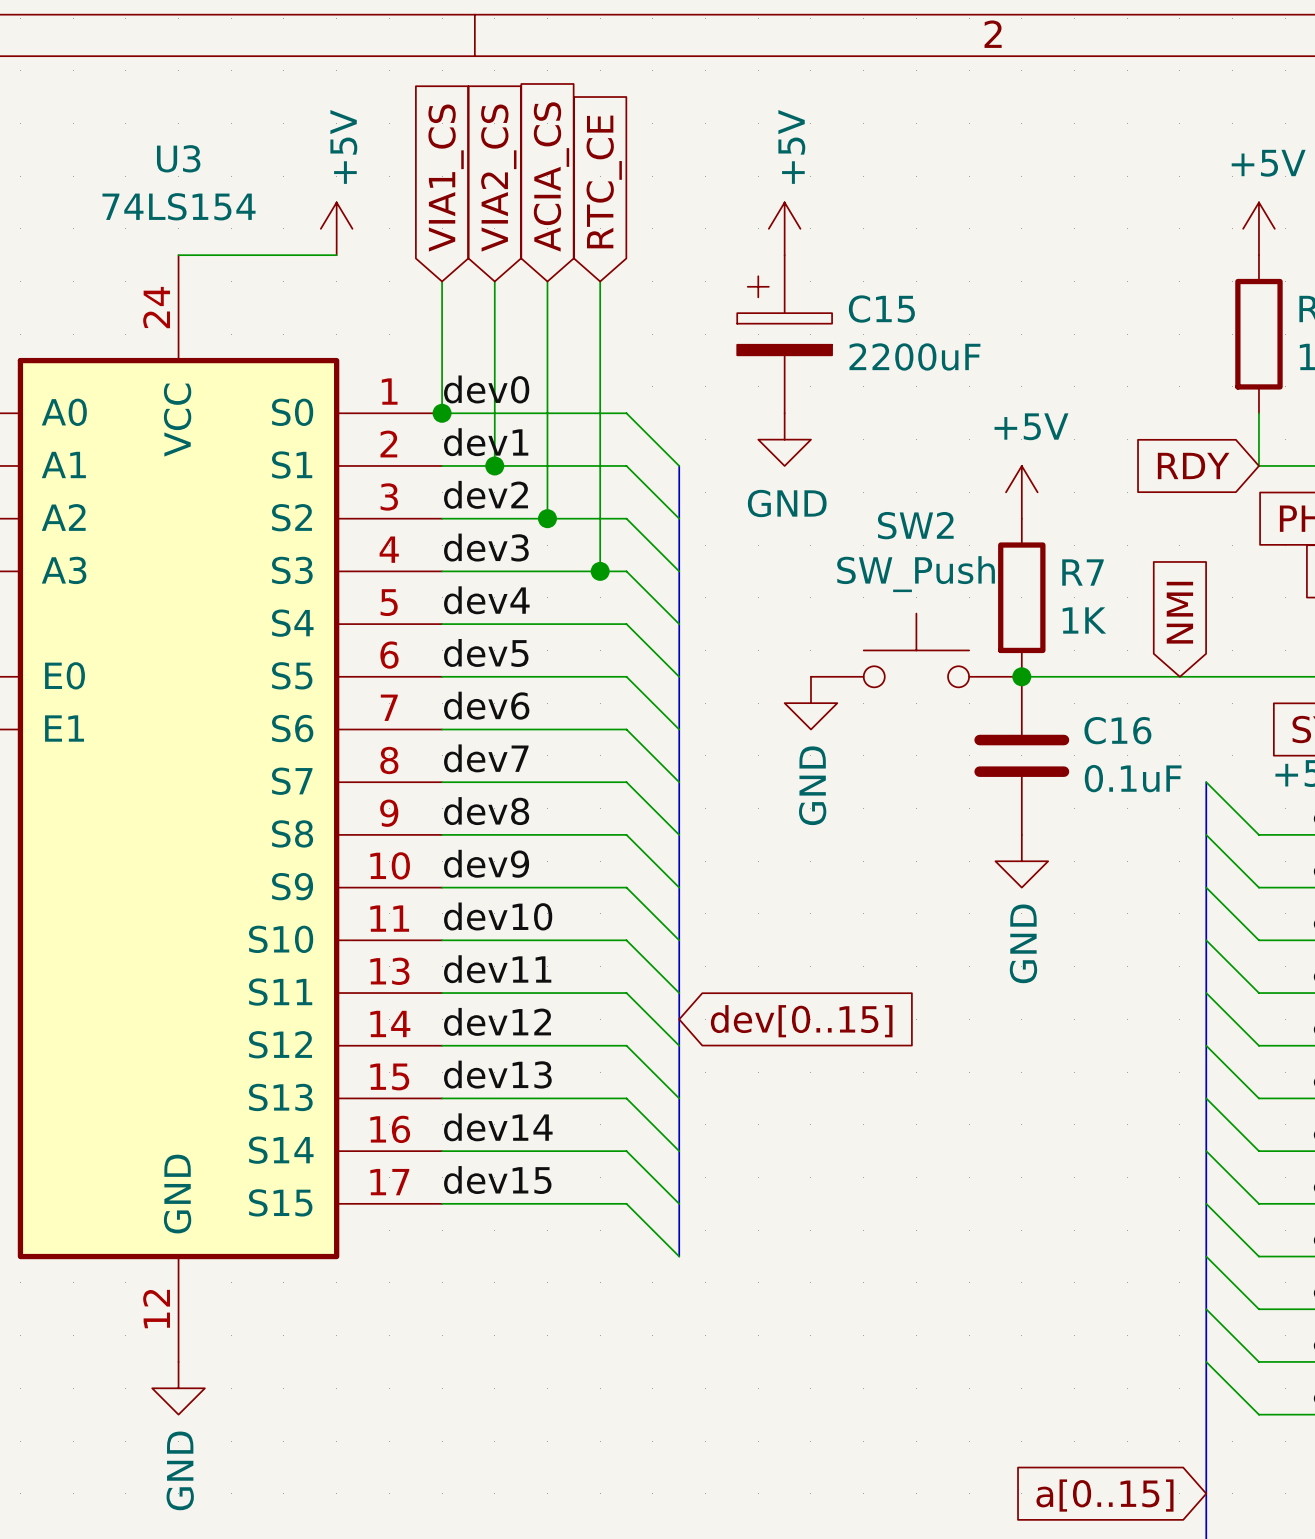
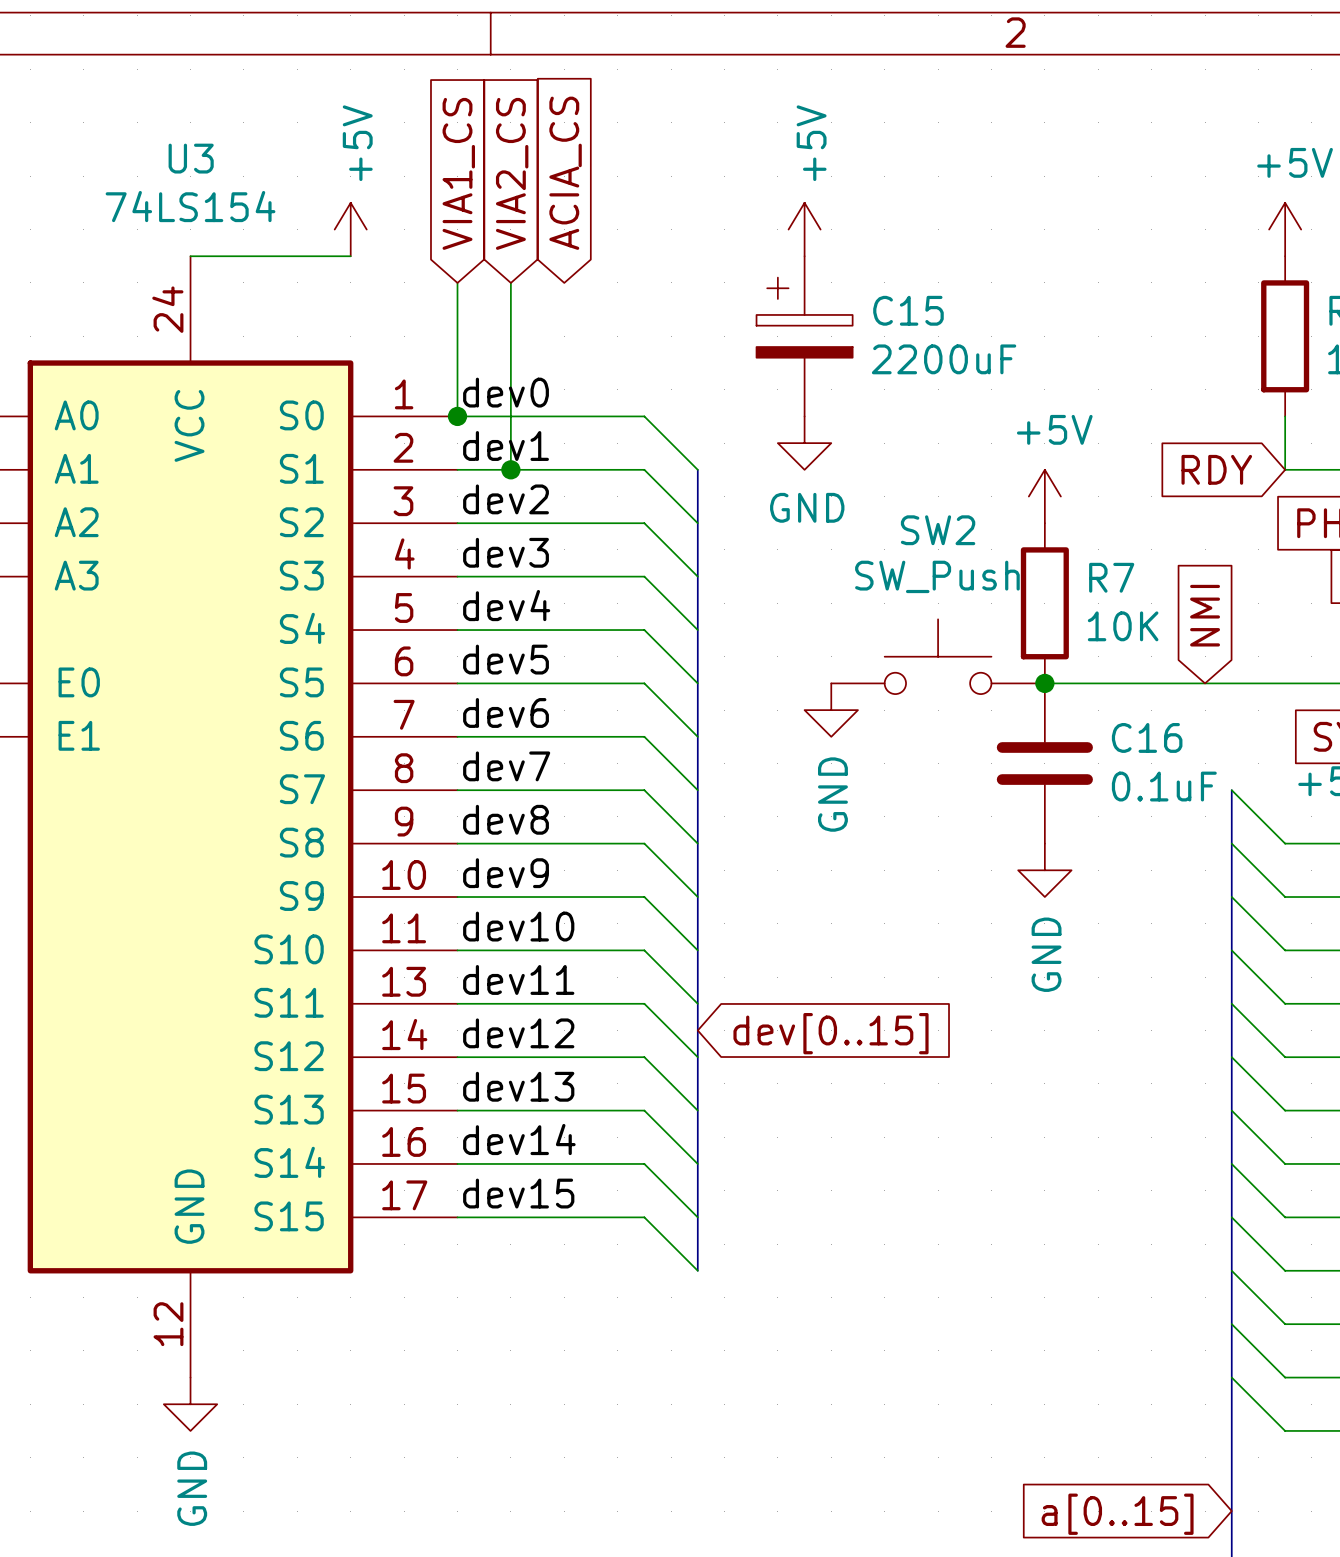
global label: RTC_CE (604, 181) -> none
wire: (547, 281) (547, 518) -> none
wire: (600, 281) (600, 571) -> none
junction: (547, 518) -> none
junction: (600, 571) -> none
R7 value: 1K (1084, 620) -> 10K (1123, 626)

